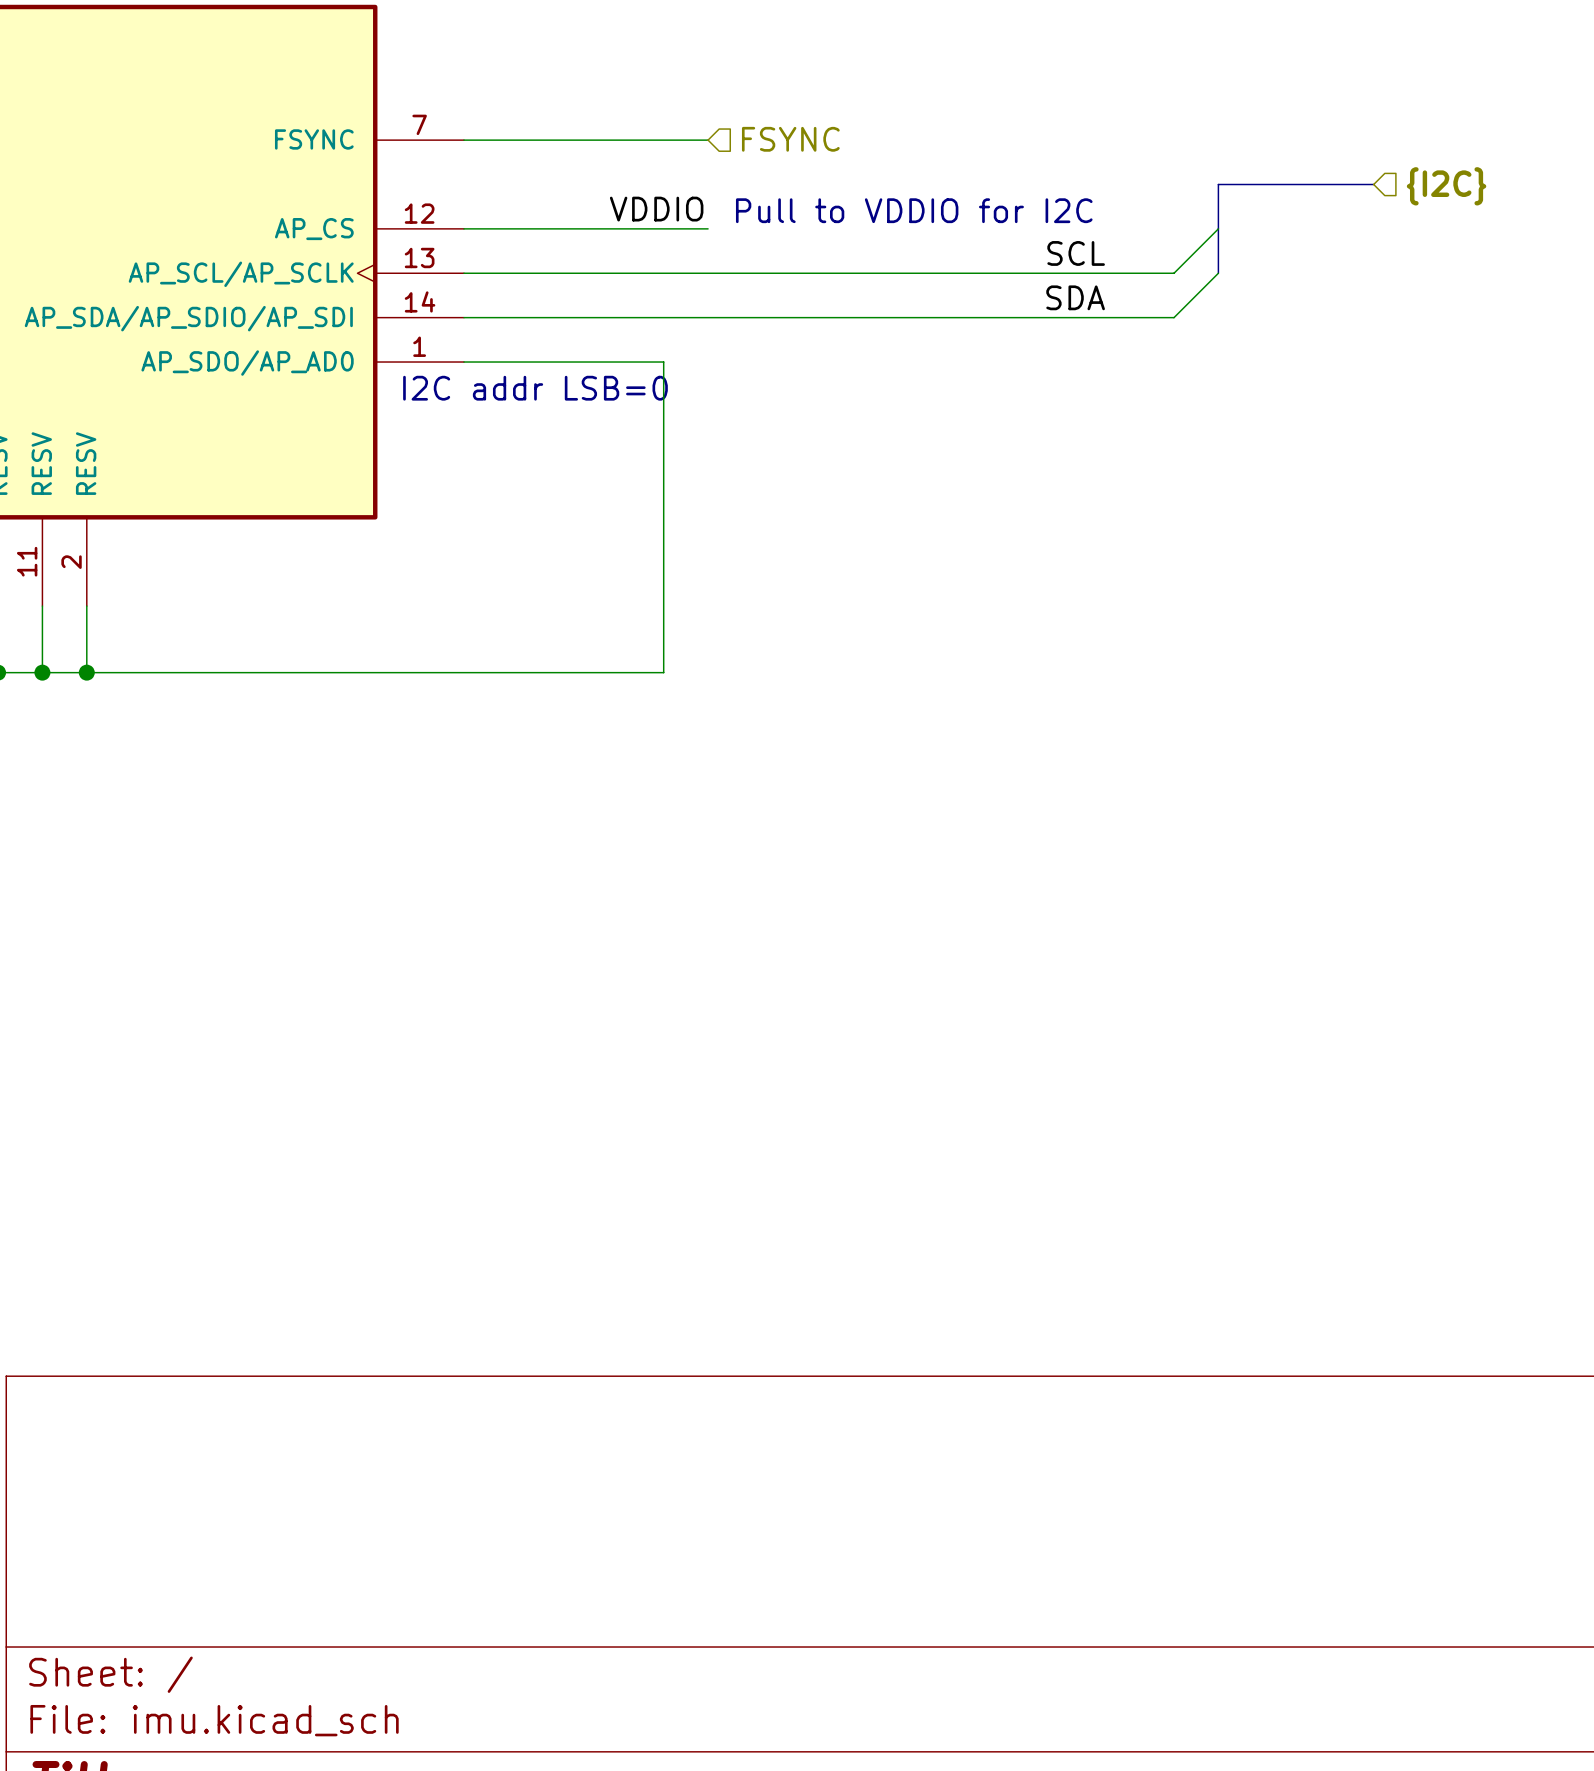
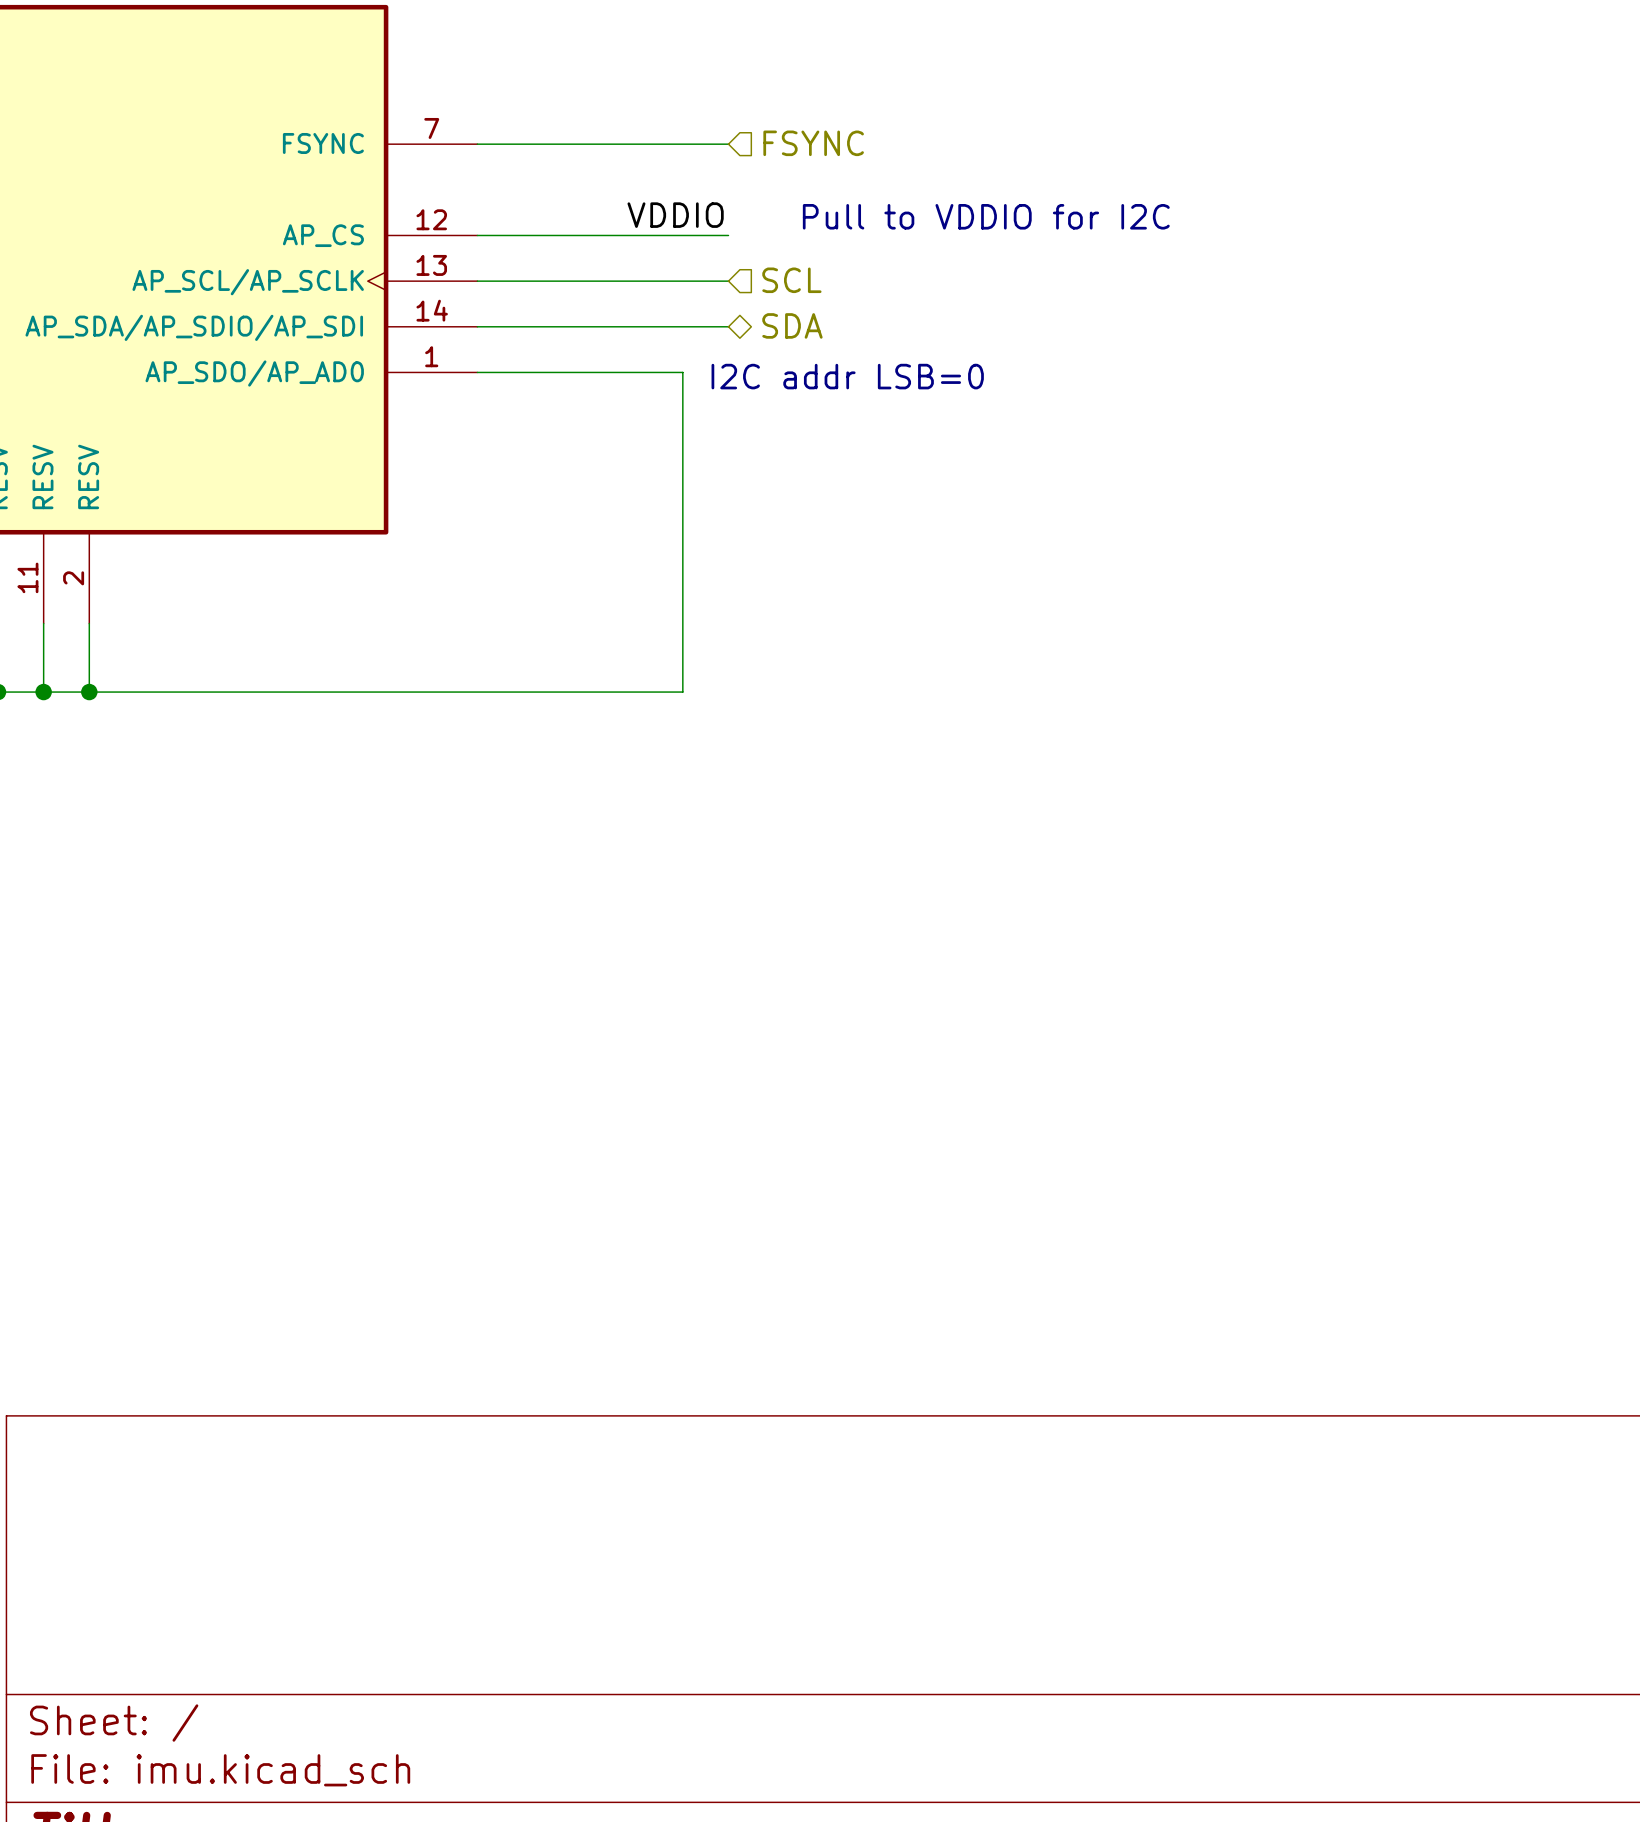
bus: (1373, 184) (1218, 184) (1218, 273) -> none
hierarchical label: {I2C} (1446, 186) -> none
text position: Pull to VDDIO for I2C (914, 210) -> Pull to VDDIO for I2C (986, 216)
wire: (1218, 228) (1174, 273) (708, 273) -> none
label: SCL (1076, 253) -> none
hierarchical label: none -> SCL (791, 280)
wire: (1218, 273) (1174, 317) (708, 317) -> none
label: SDA (1075, 297) -> none
hierarchical label: none -> SDA (792, 325)
text position: I2C addr LSB=0 (535, 388) -> I2C addr LSB=0 (847, 376)

